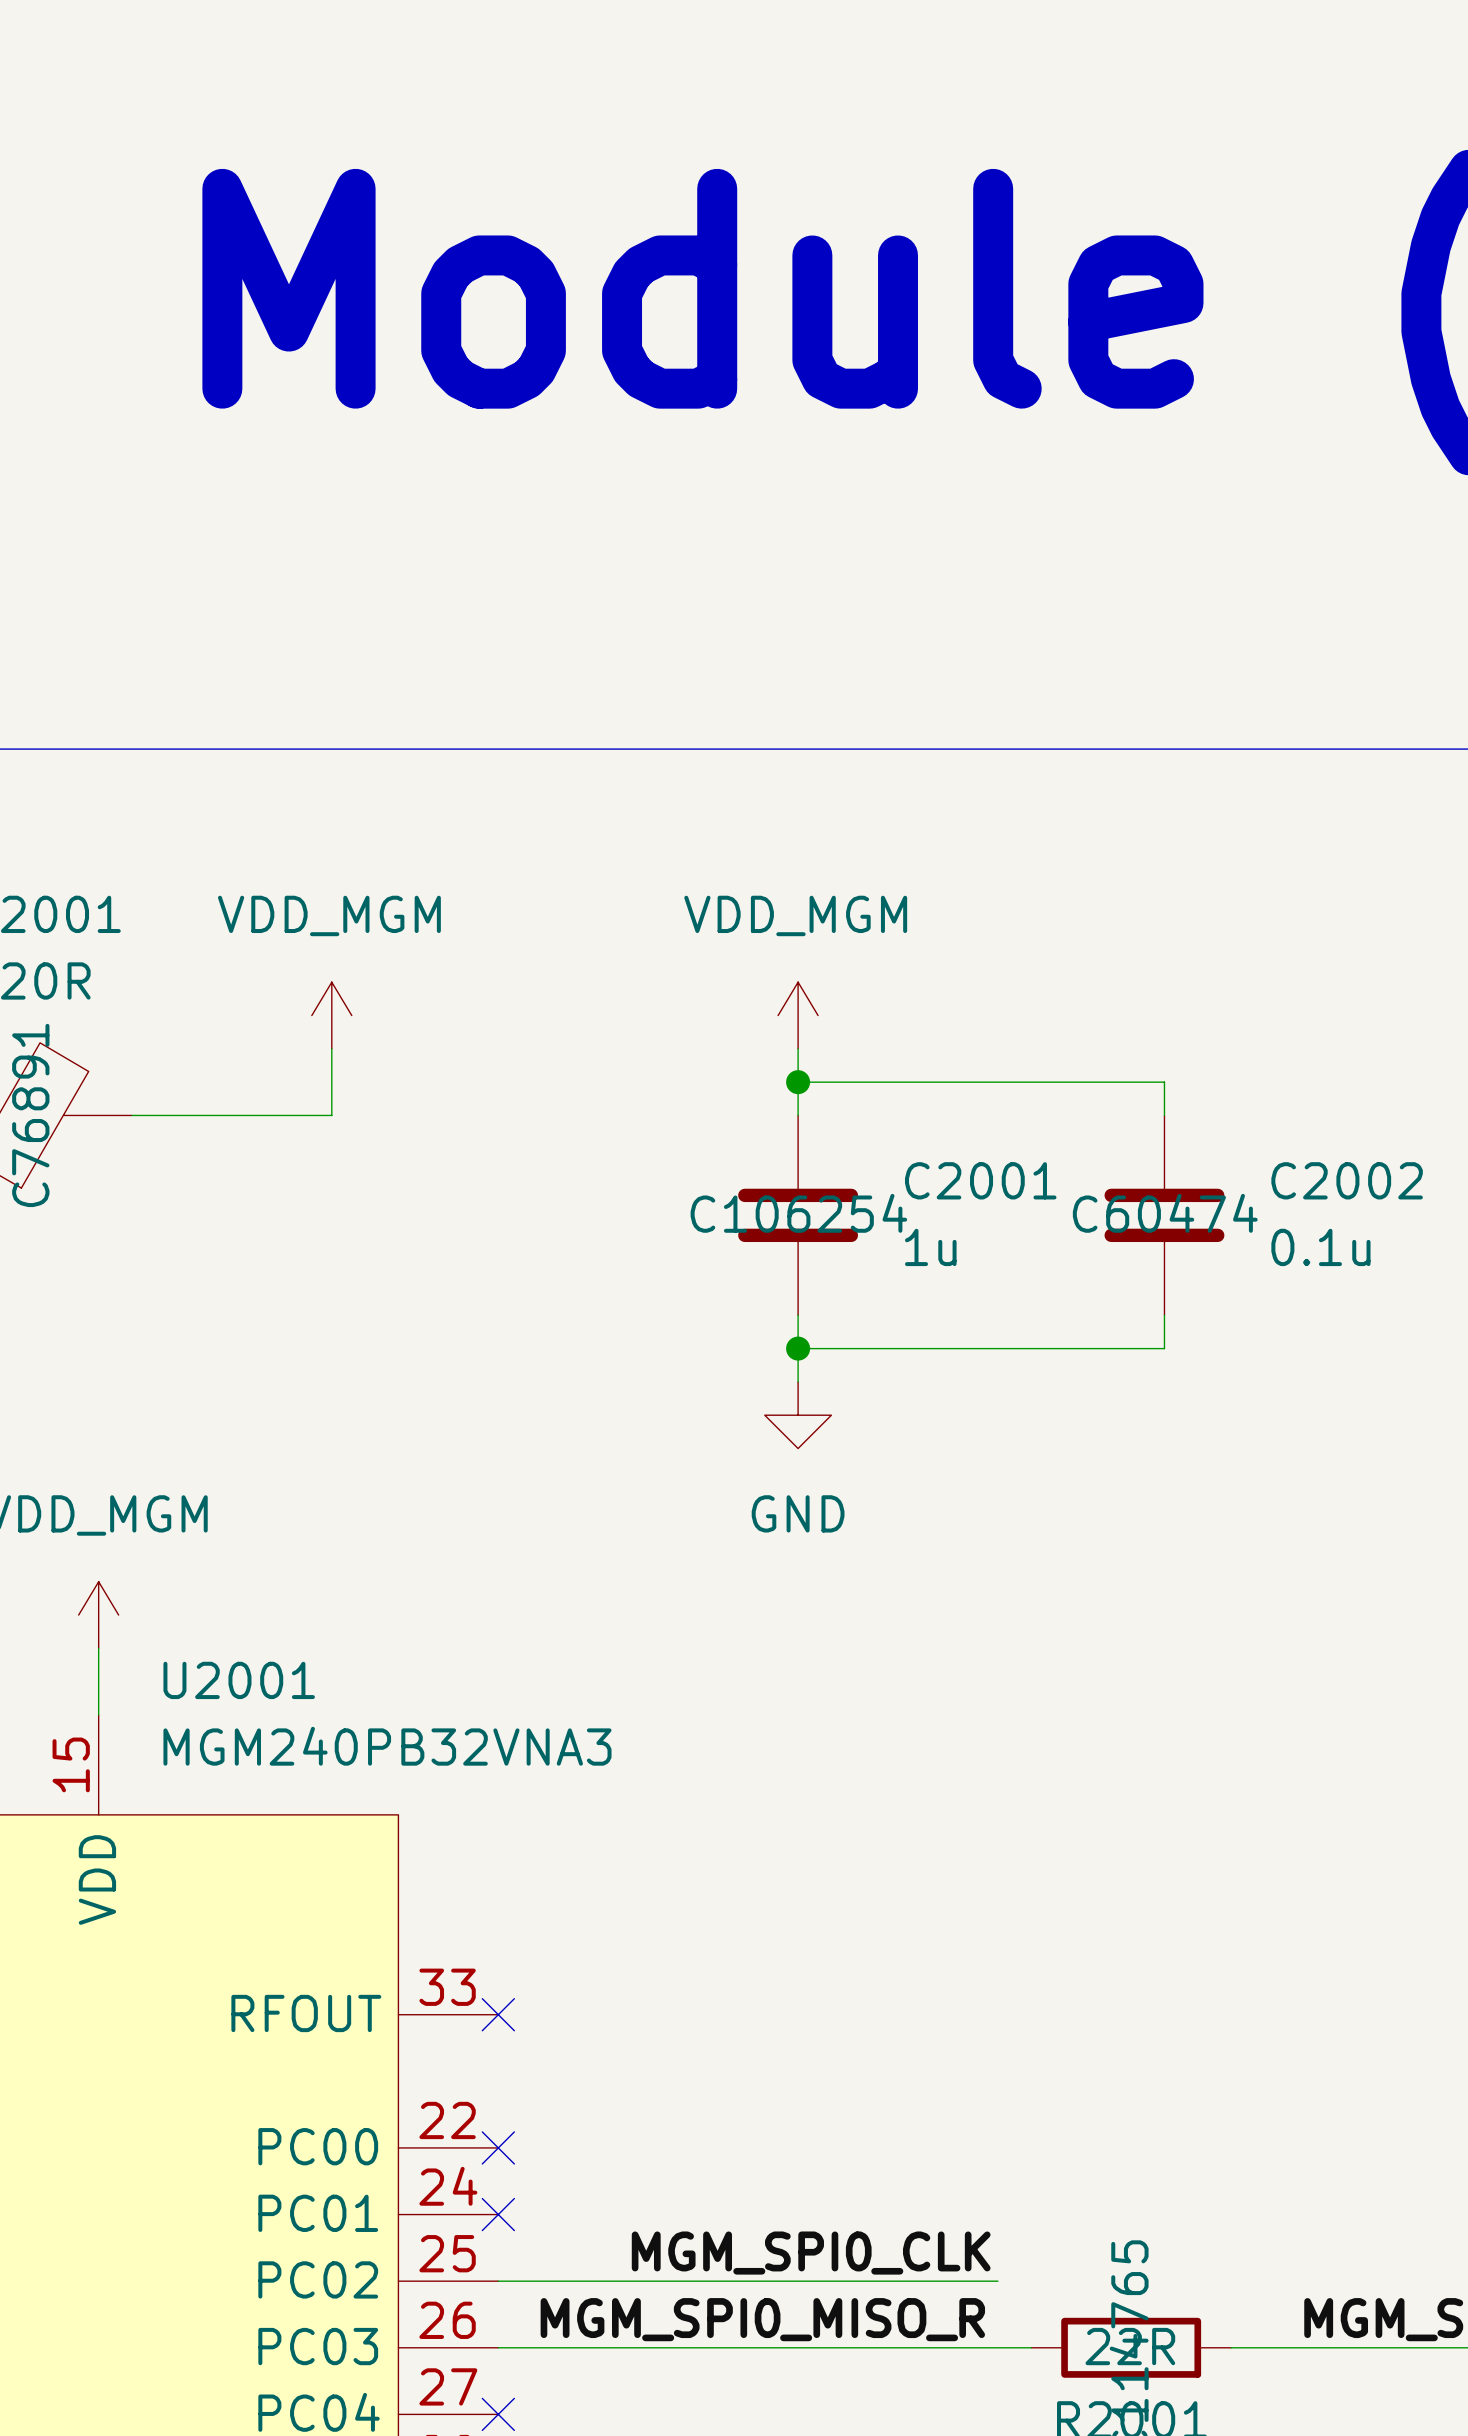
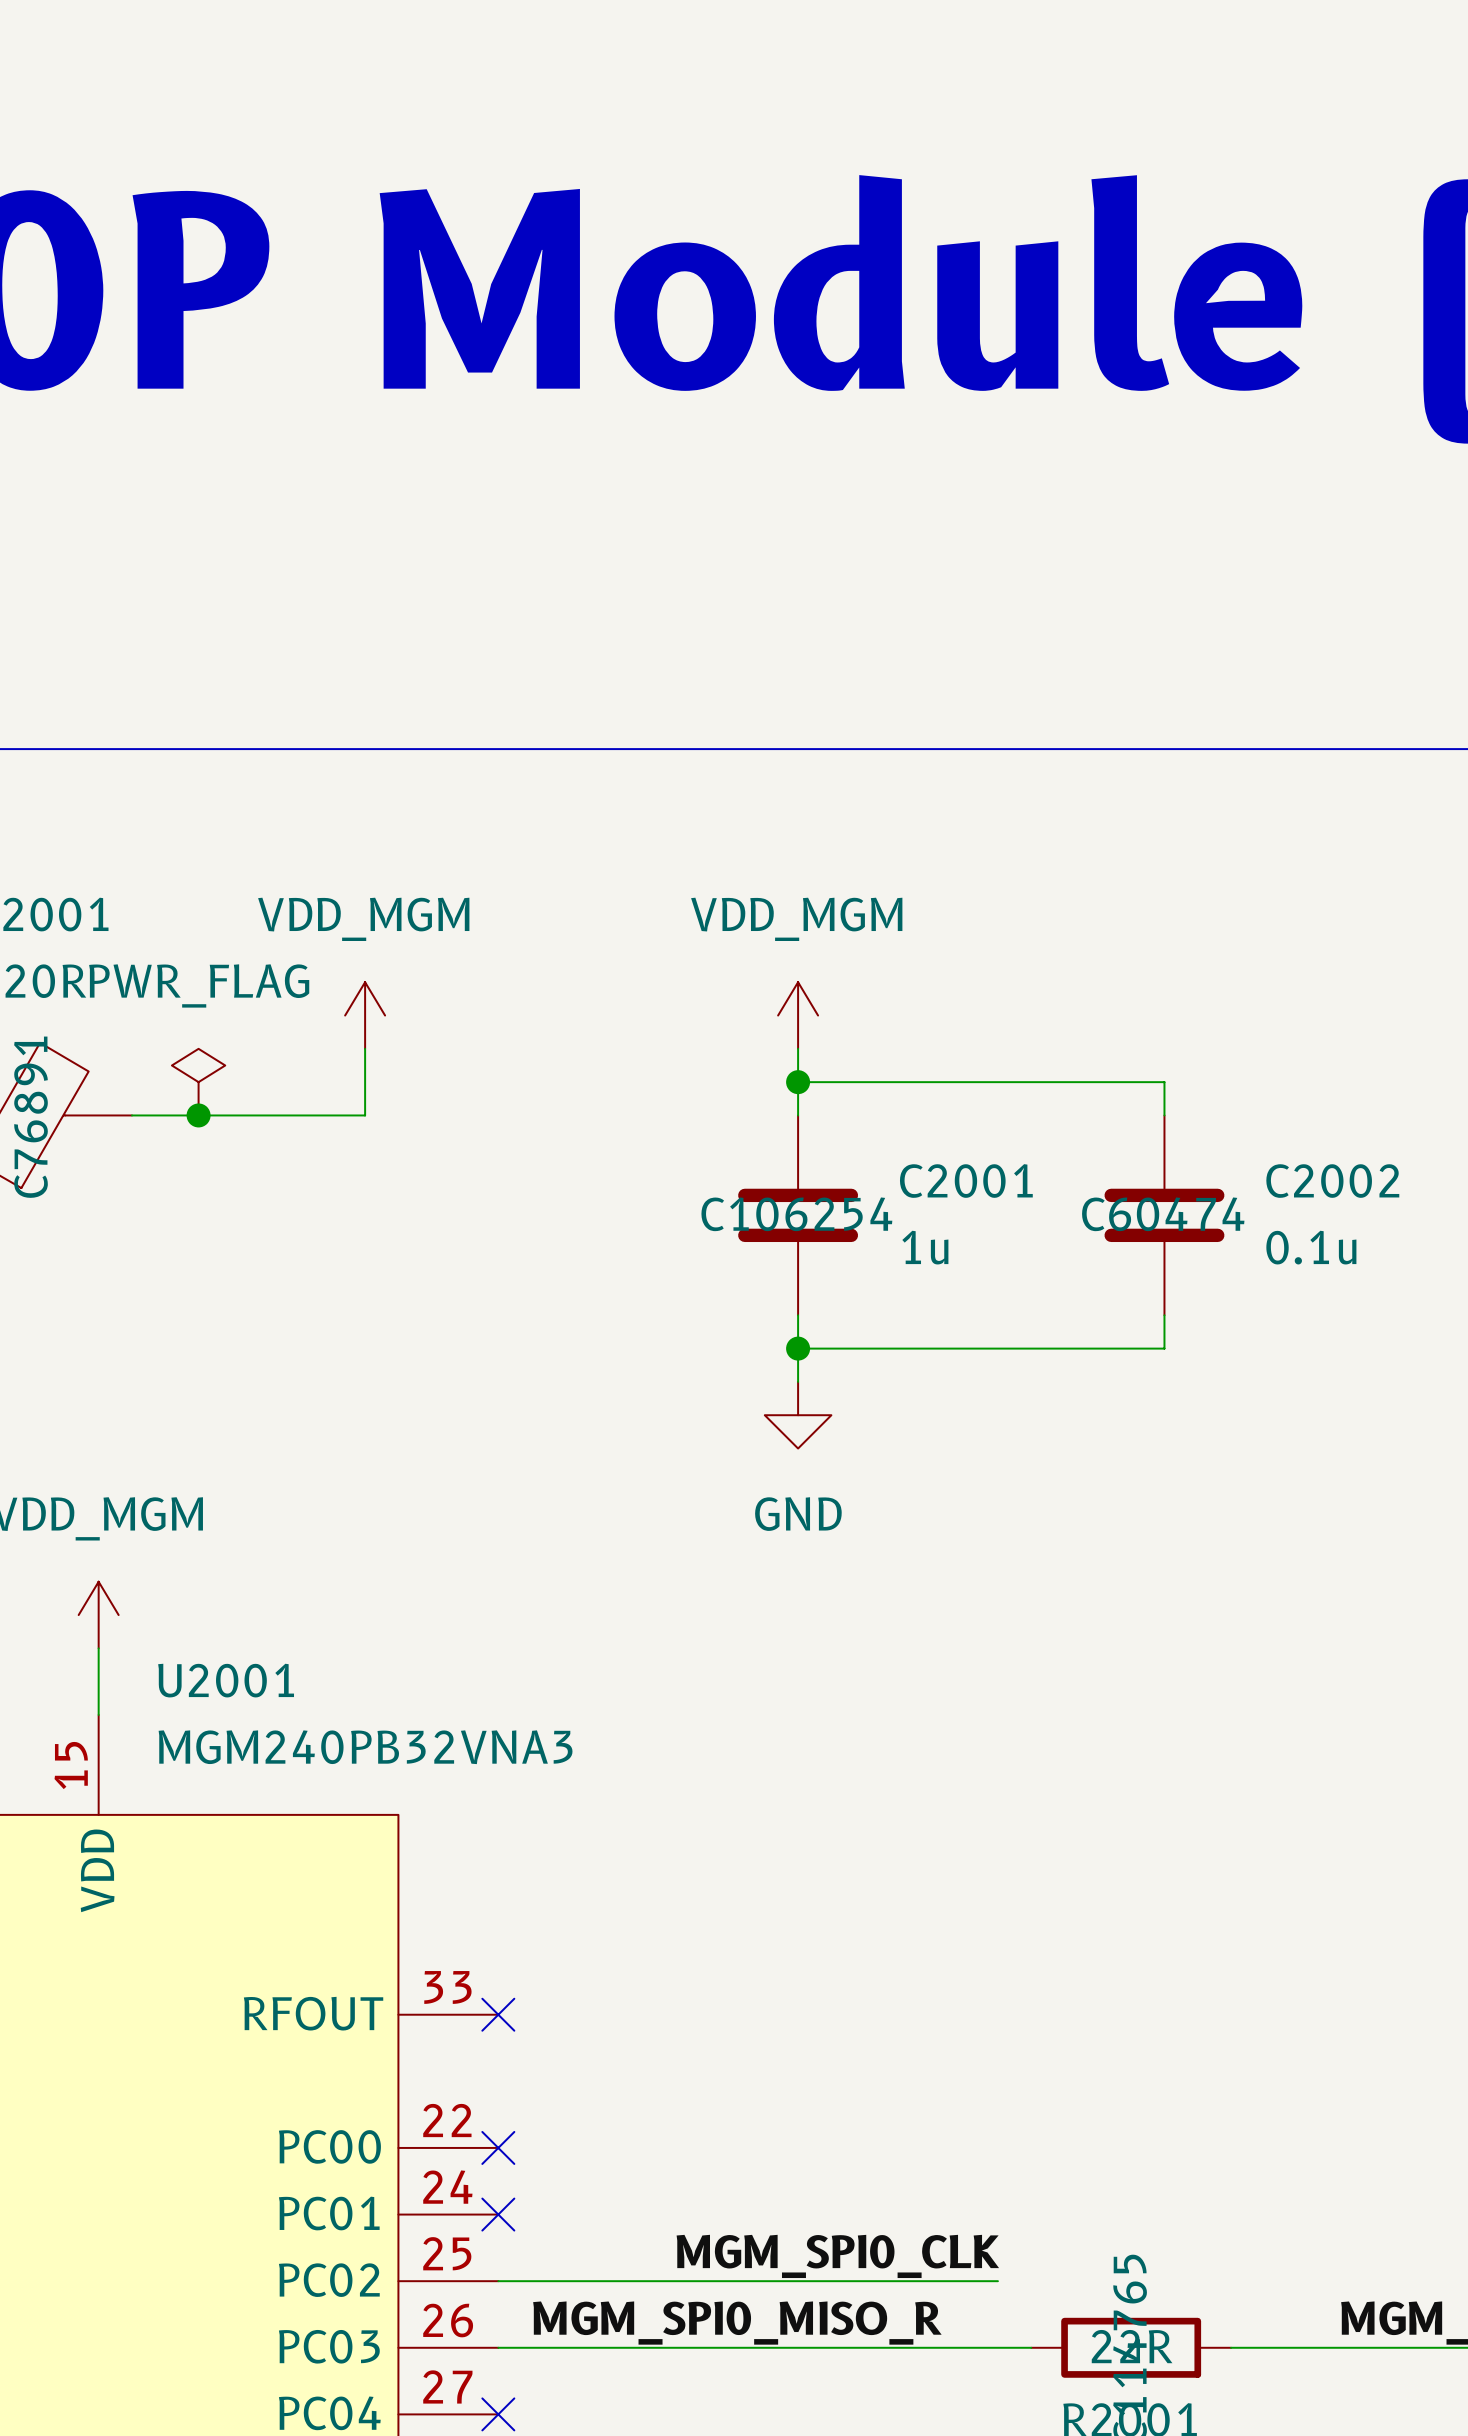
power symbol position: VDD_MGM (331, 1015) -> VDD_MGM (365, 1015)
wire: (331, 1048) (331, 1115) -> (365, 1048) (365, 1115) (331, 1115)
power symbol: none -> PWR_FLAG (198, 1082)
junction: none -> (198, 1115)

